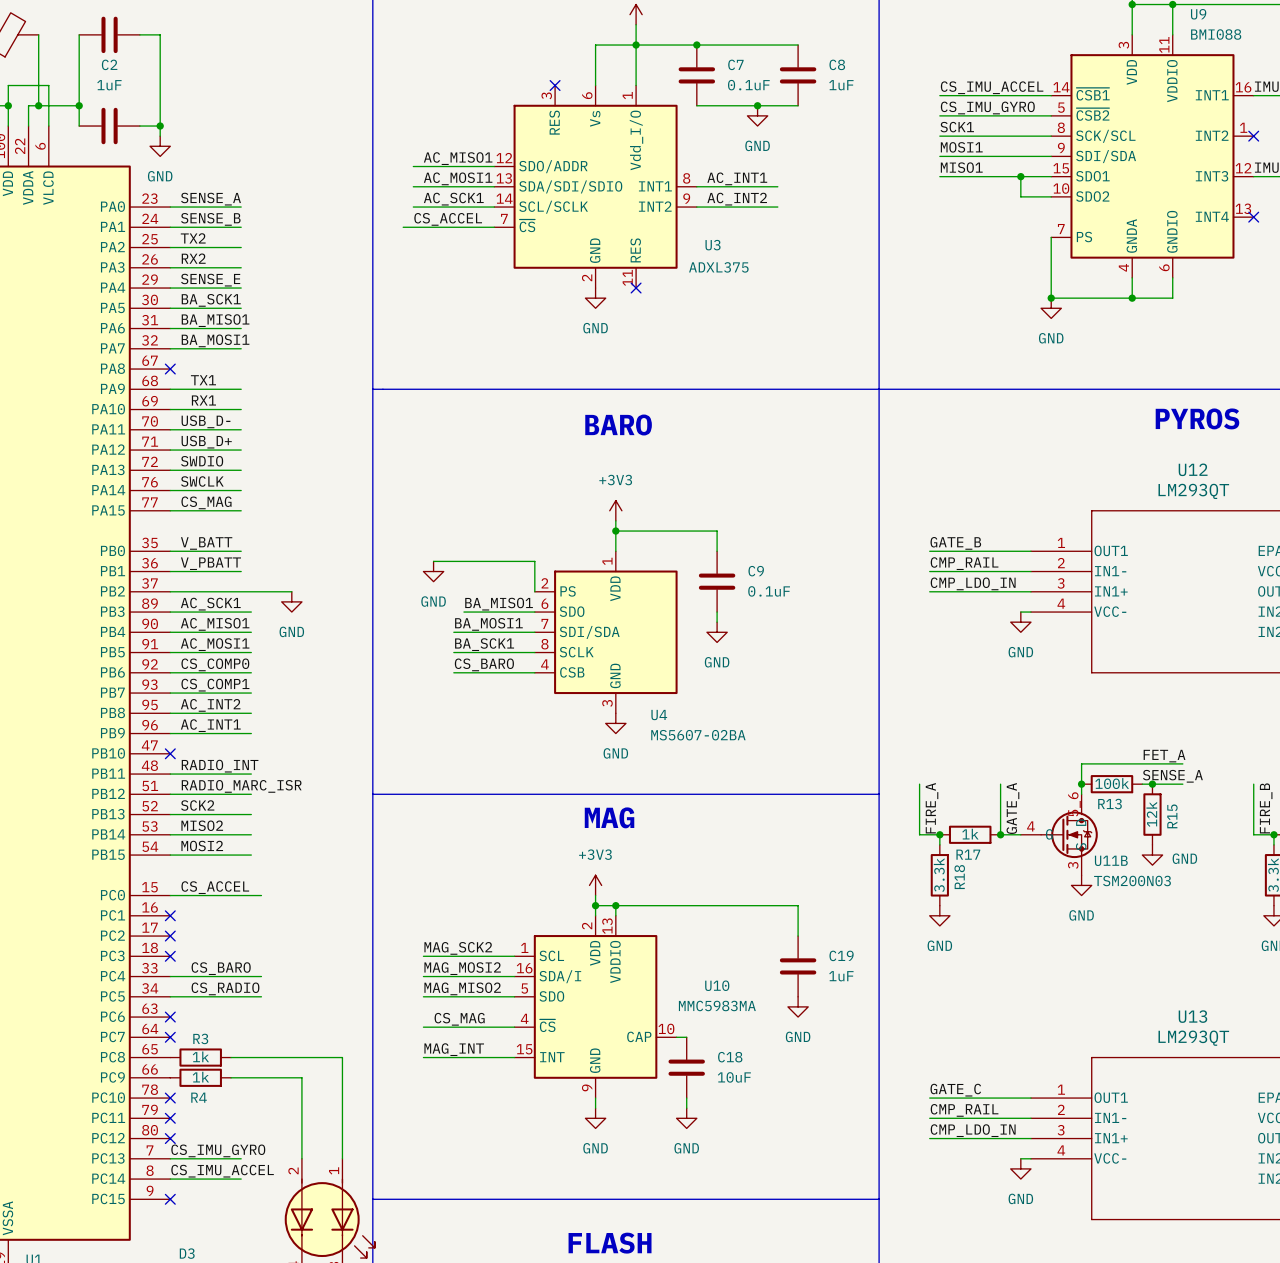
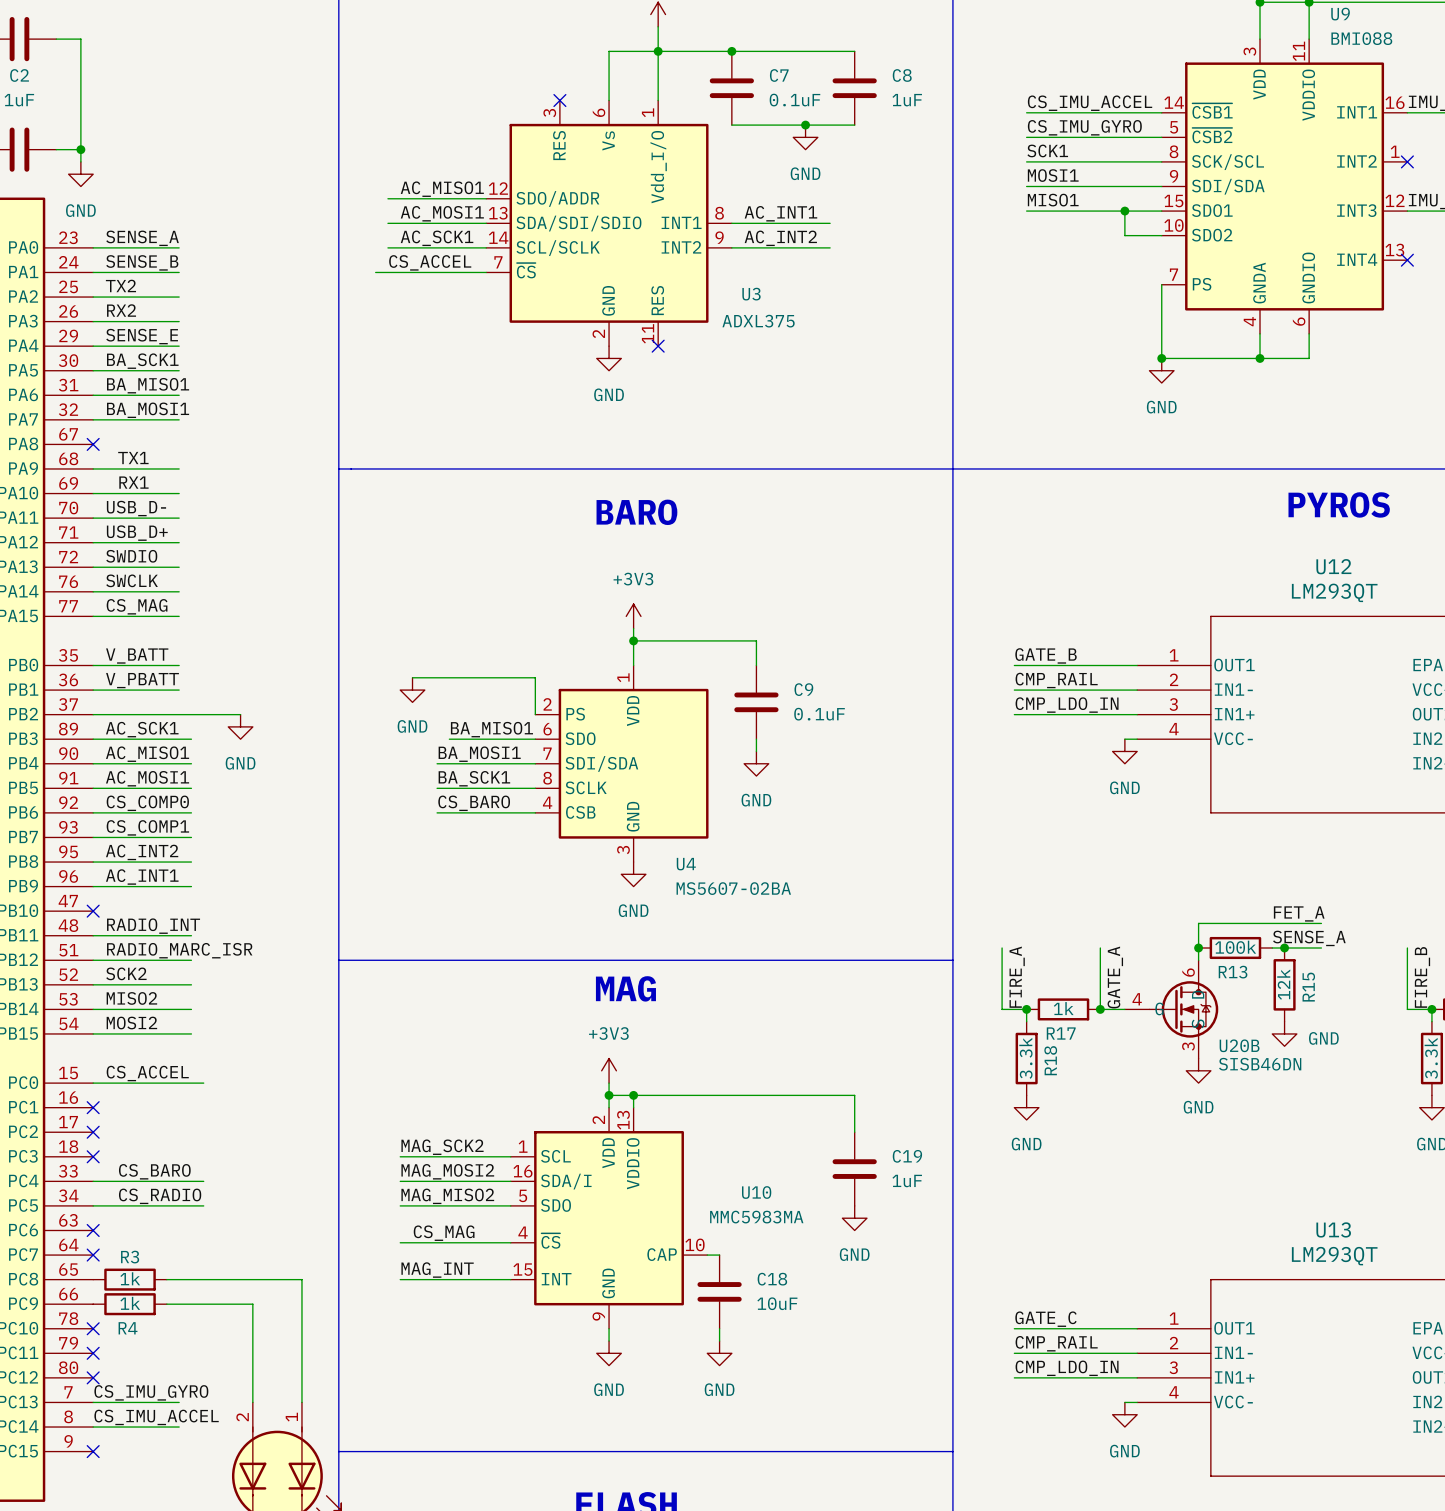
U11B: TSM200N03 (1059, 834) -> none
U20B: none -> SISB46DN (1171, 1009)

